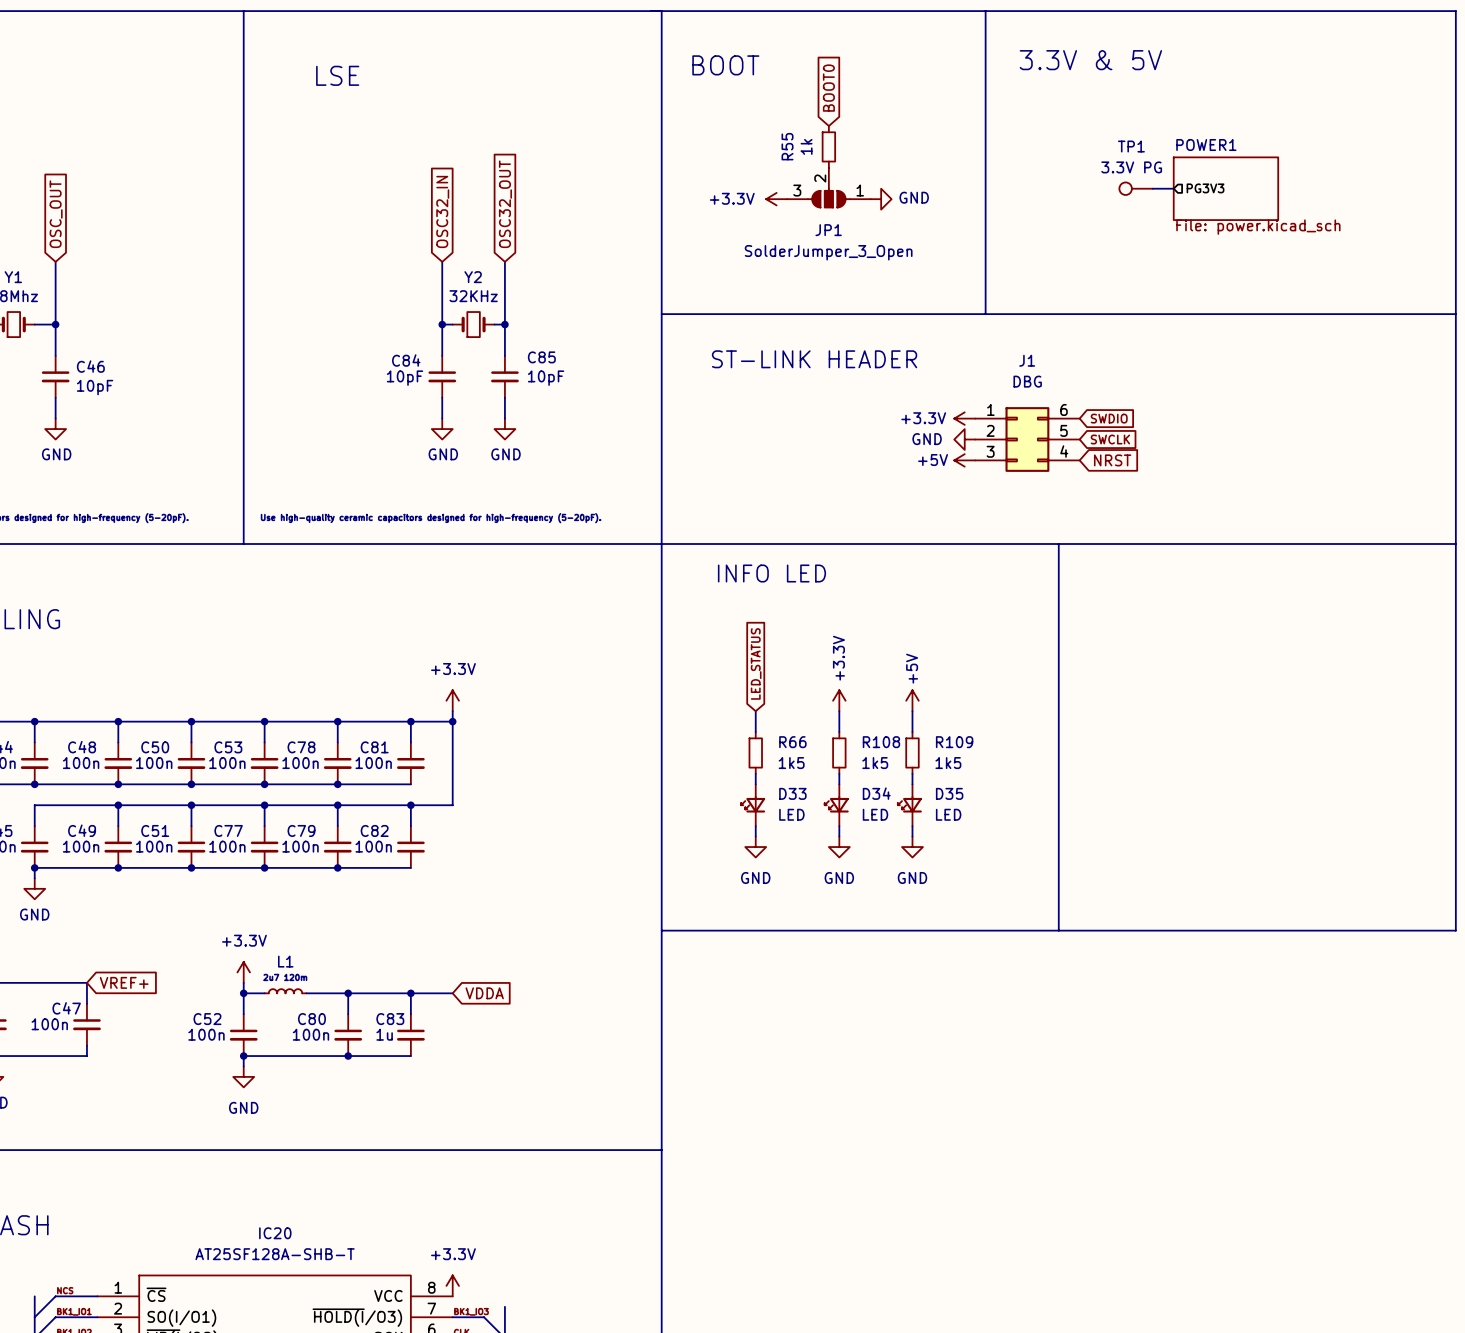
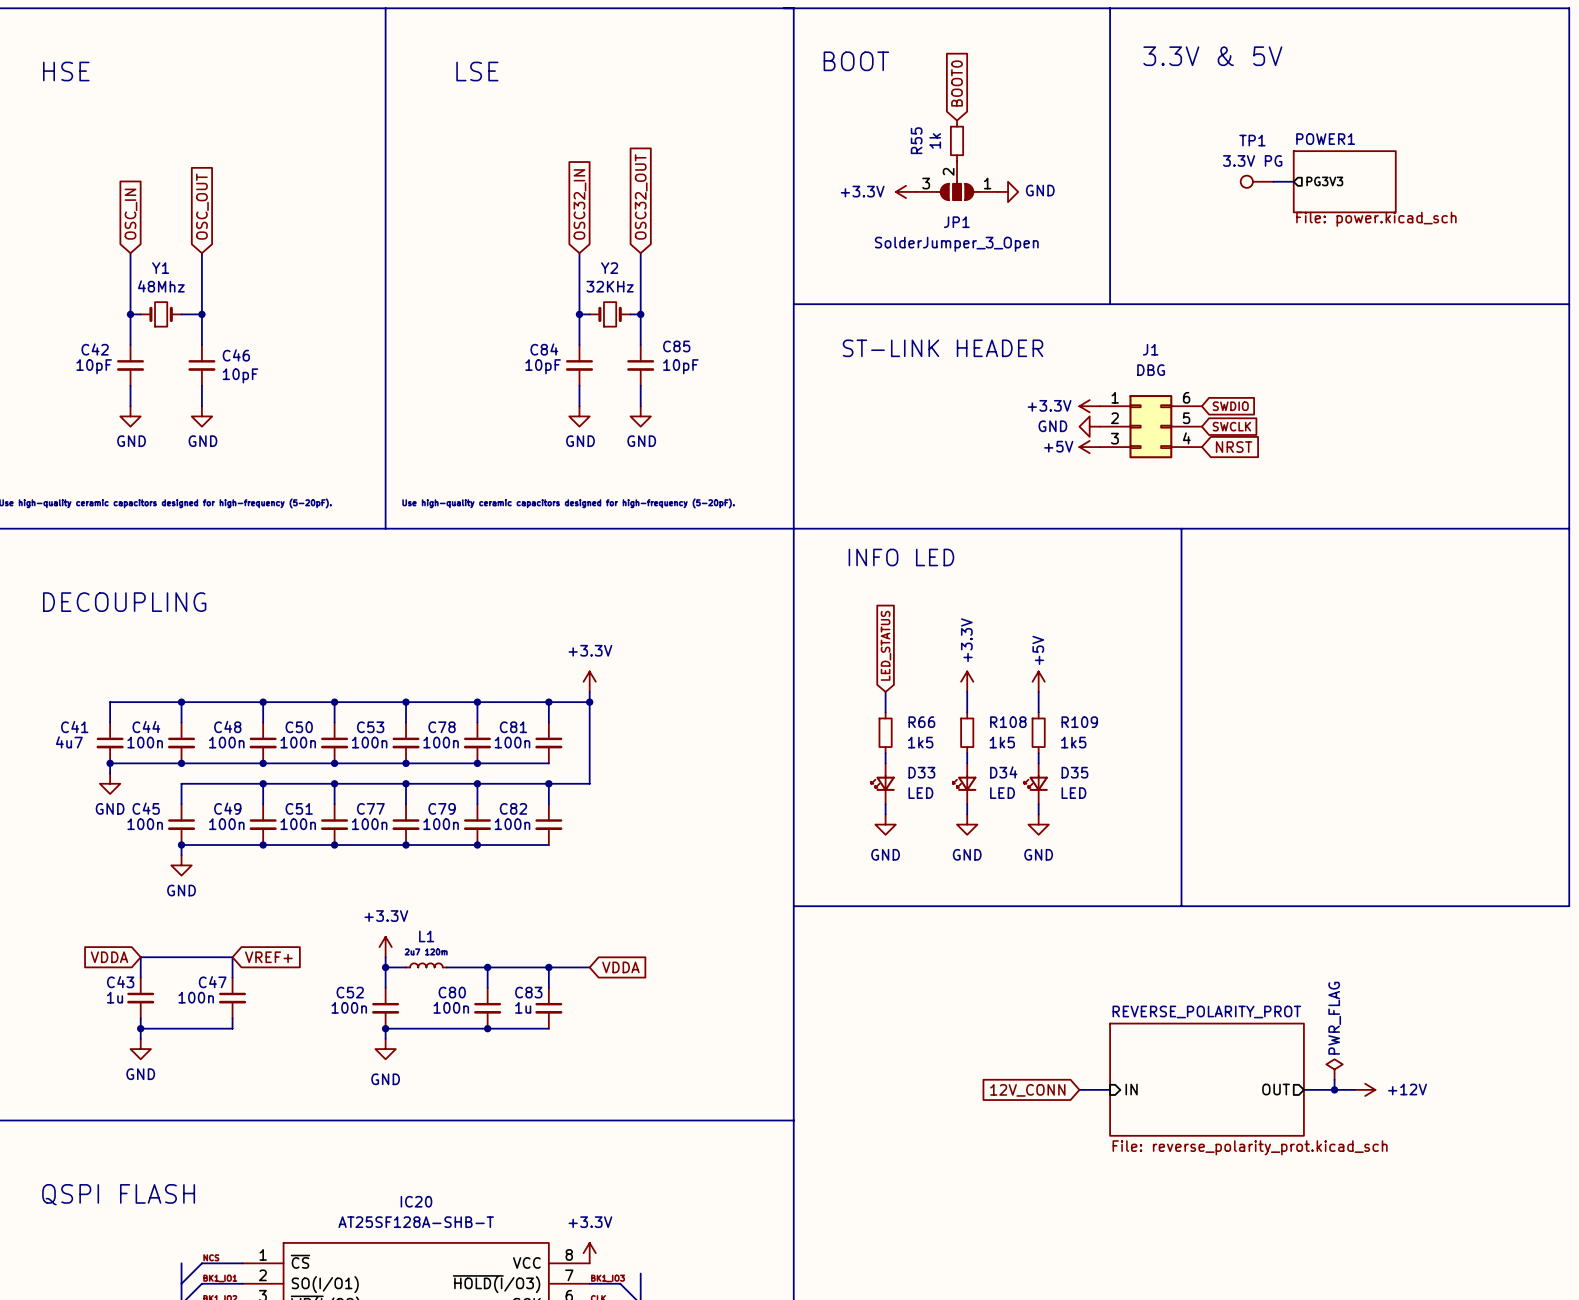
power symbol: none -> PWR_FLAG (1334, 1069)
sheet REVERSE_POLARITY_PROT: none -> File: reverse_polarity_prot.kicad_sch (1207, 1079)
wire: none -> (1334, 1079) (1334, 1089)
wire: none -> (1079, 1089) (1110, 1089)
sheet pin: none -> IN (1131, 1089)
sheet pin: none -> OUT (1276, 1089)
wire: none -> (1303, 1089) (1354, 1089)
junction: none -> (1334, 1089)
power symbol: none -> +12V (1365, 1089)
global label: none -> 12V_CONN (1027, 1090)

